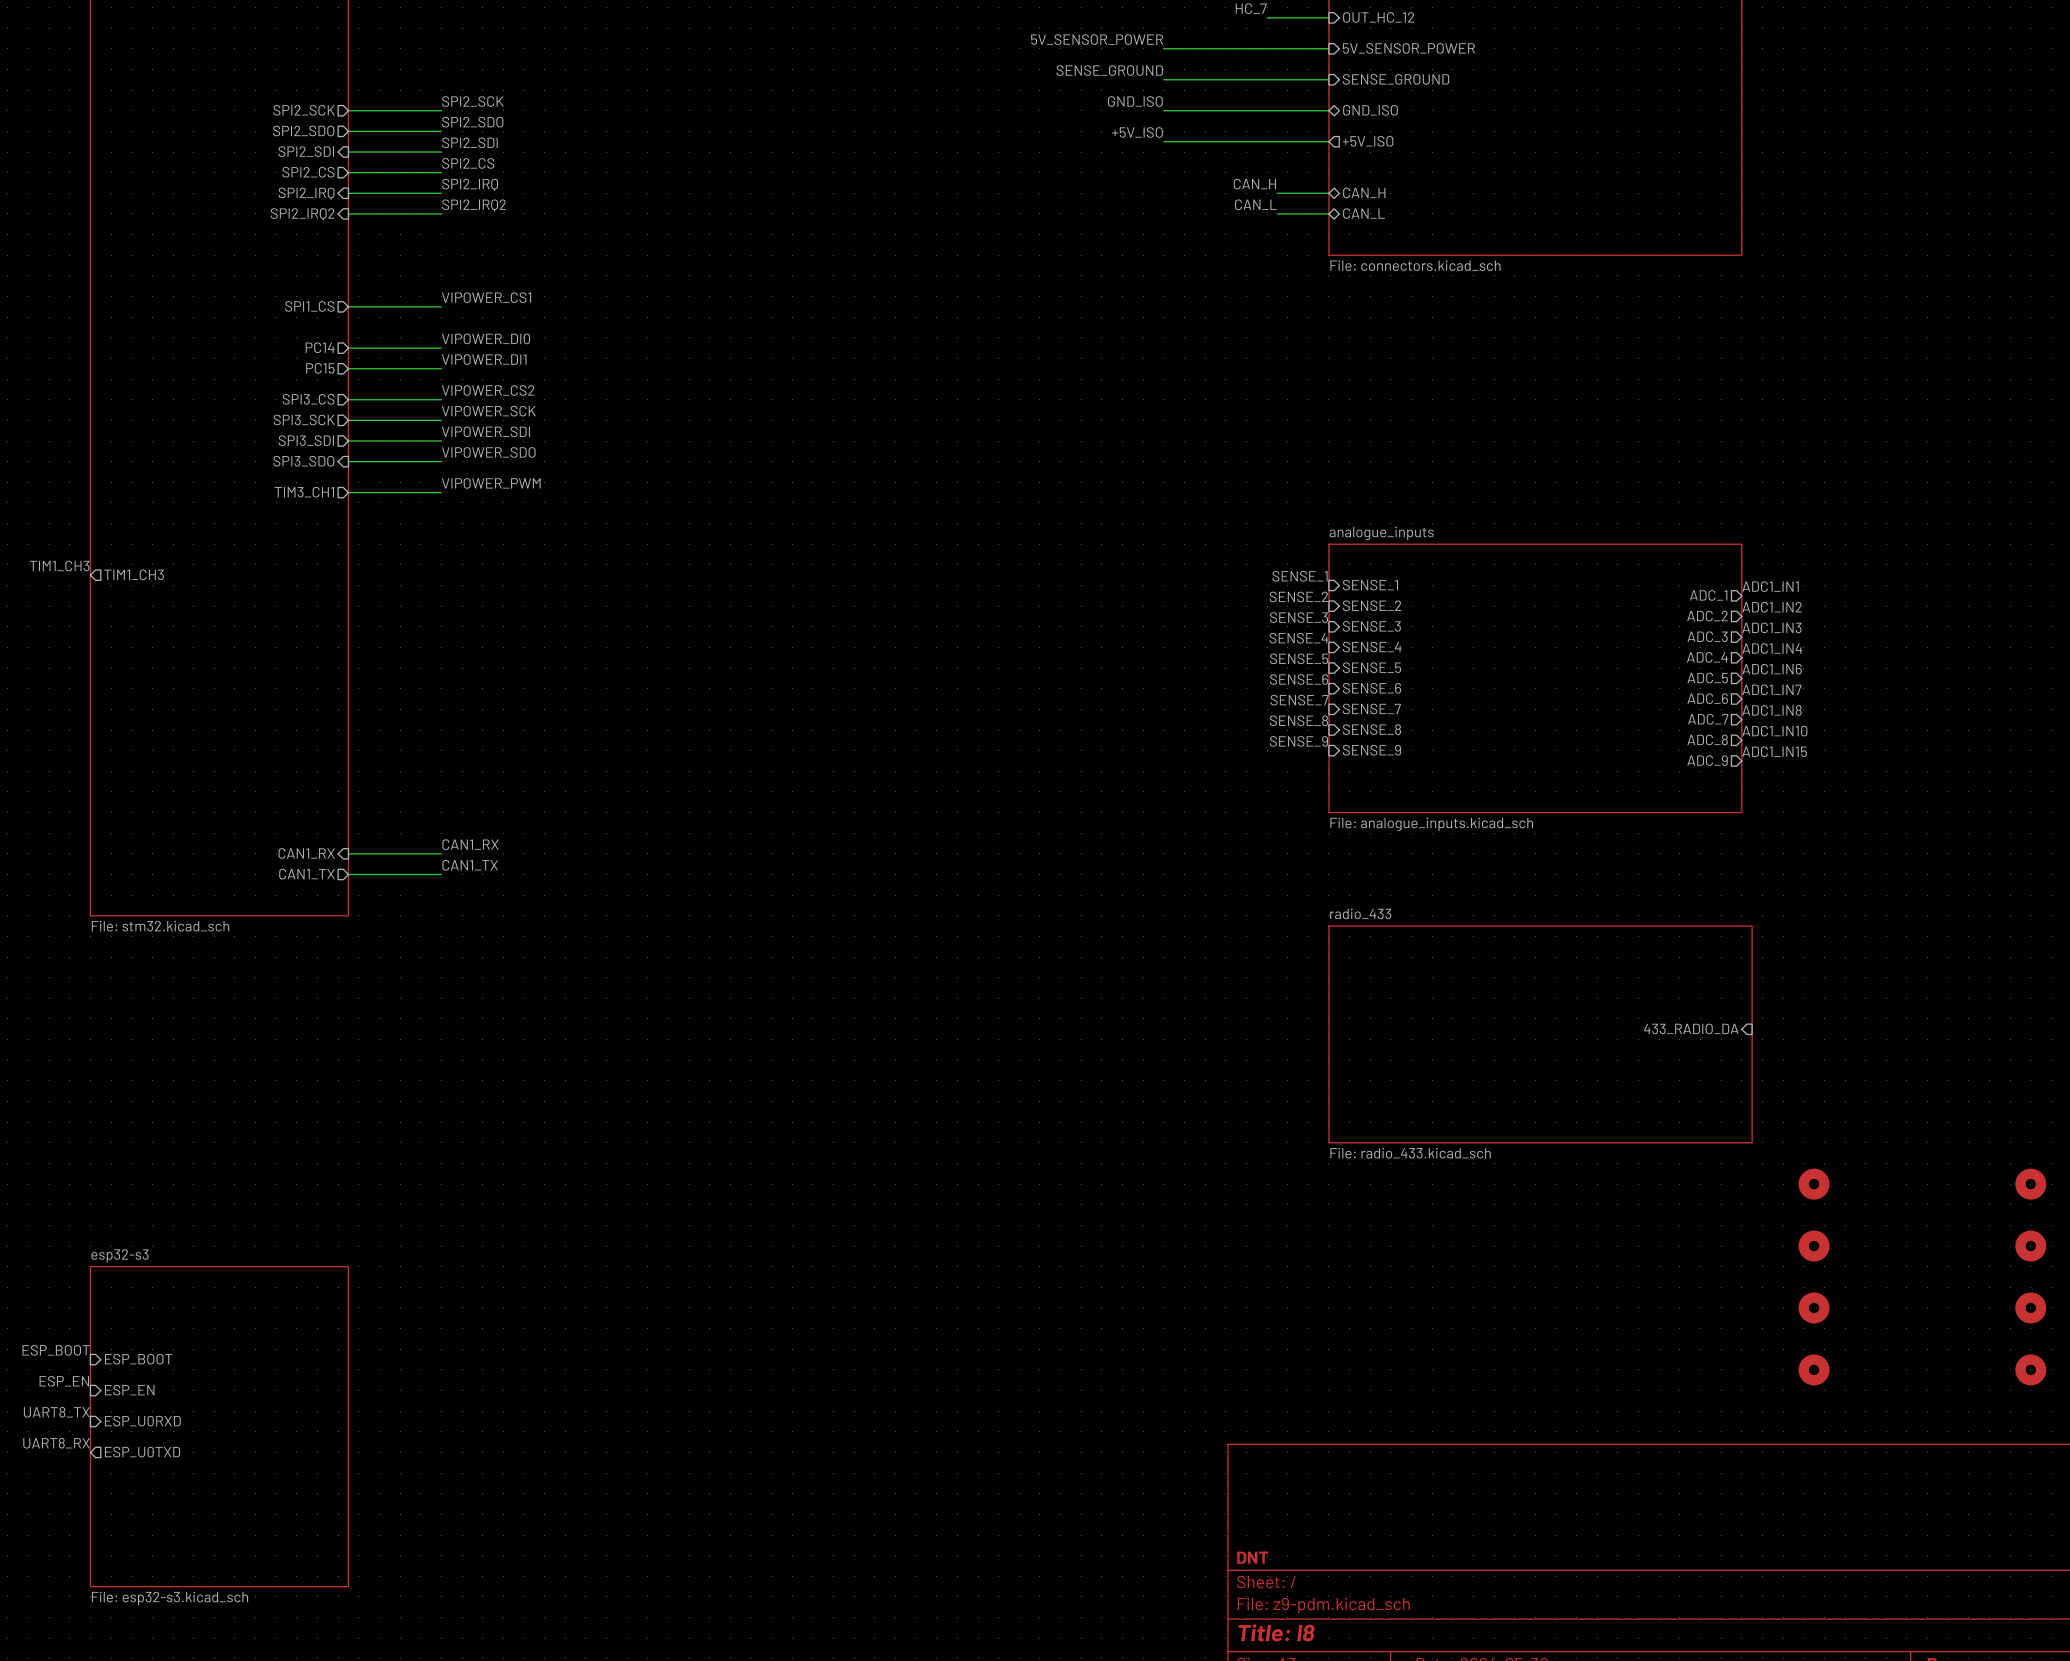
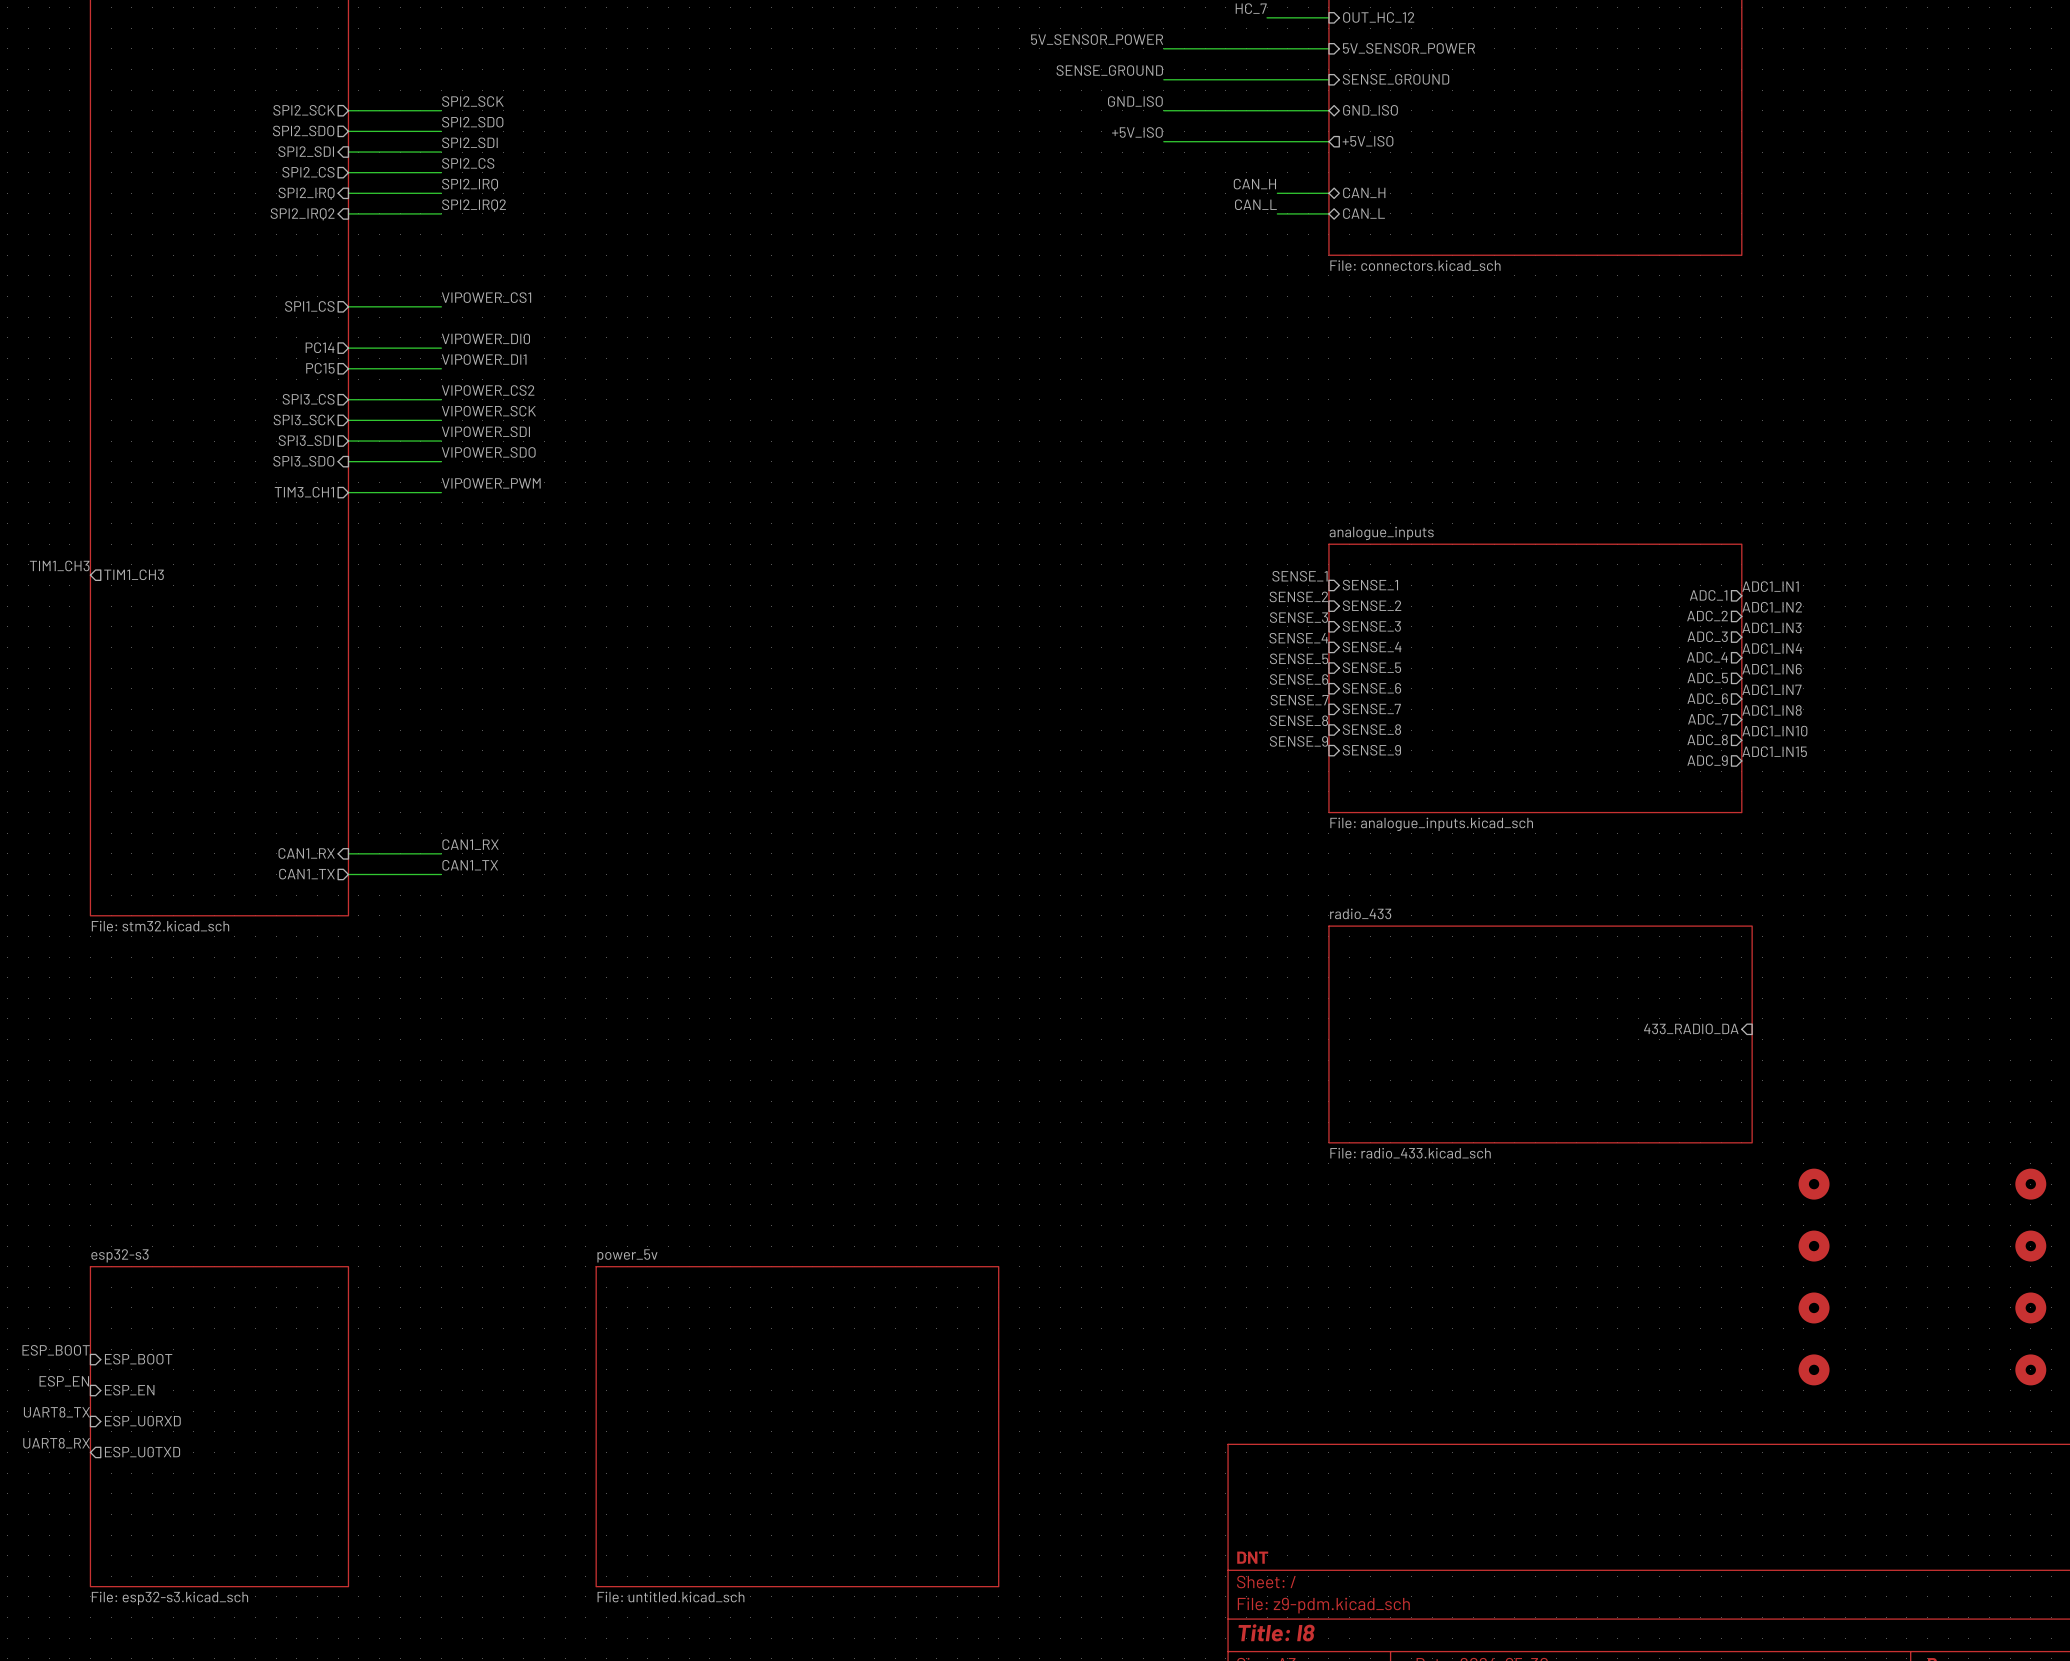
sheet power_5v: none -> File: untitled.kicad_sch (797, 1426)

